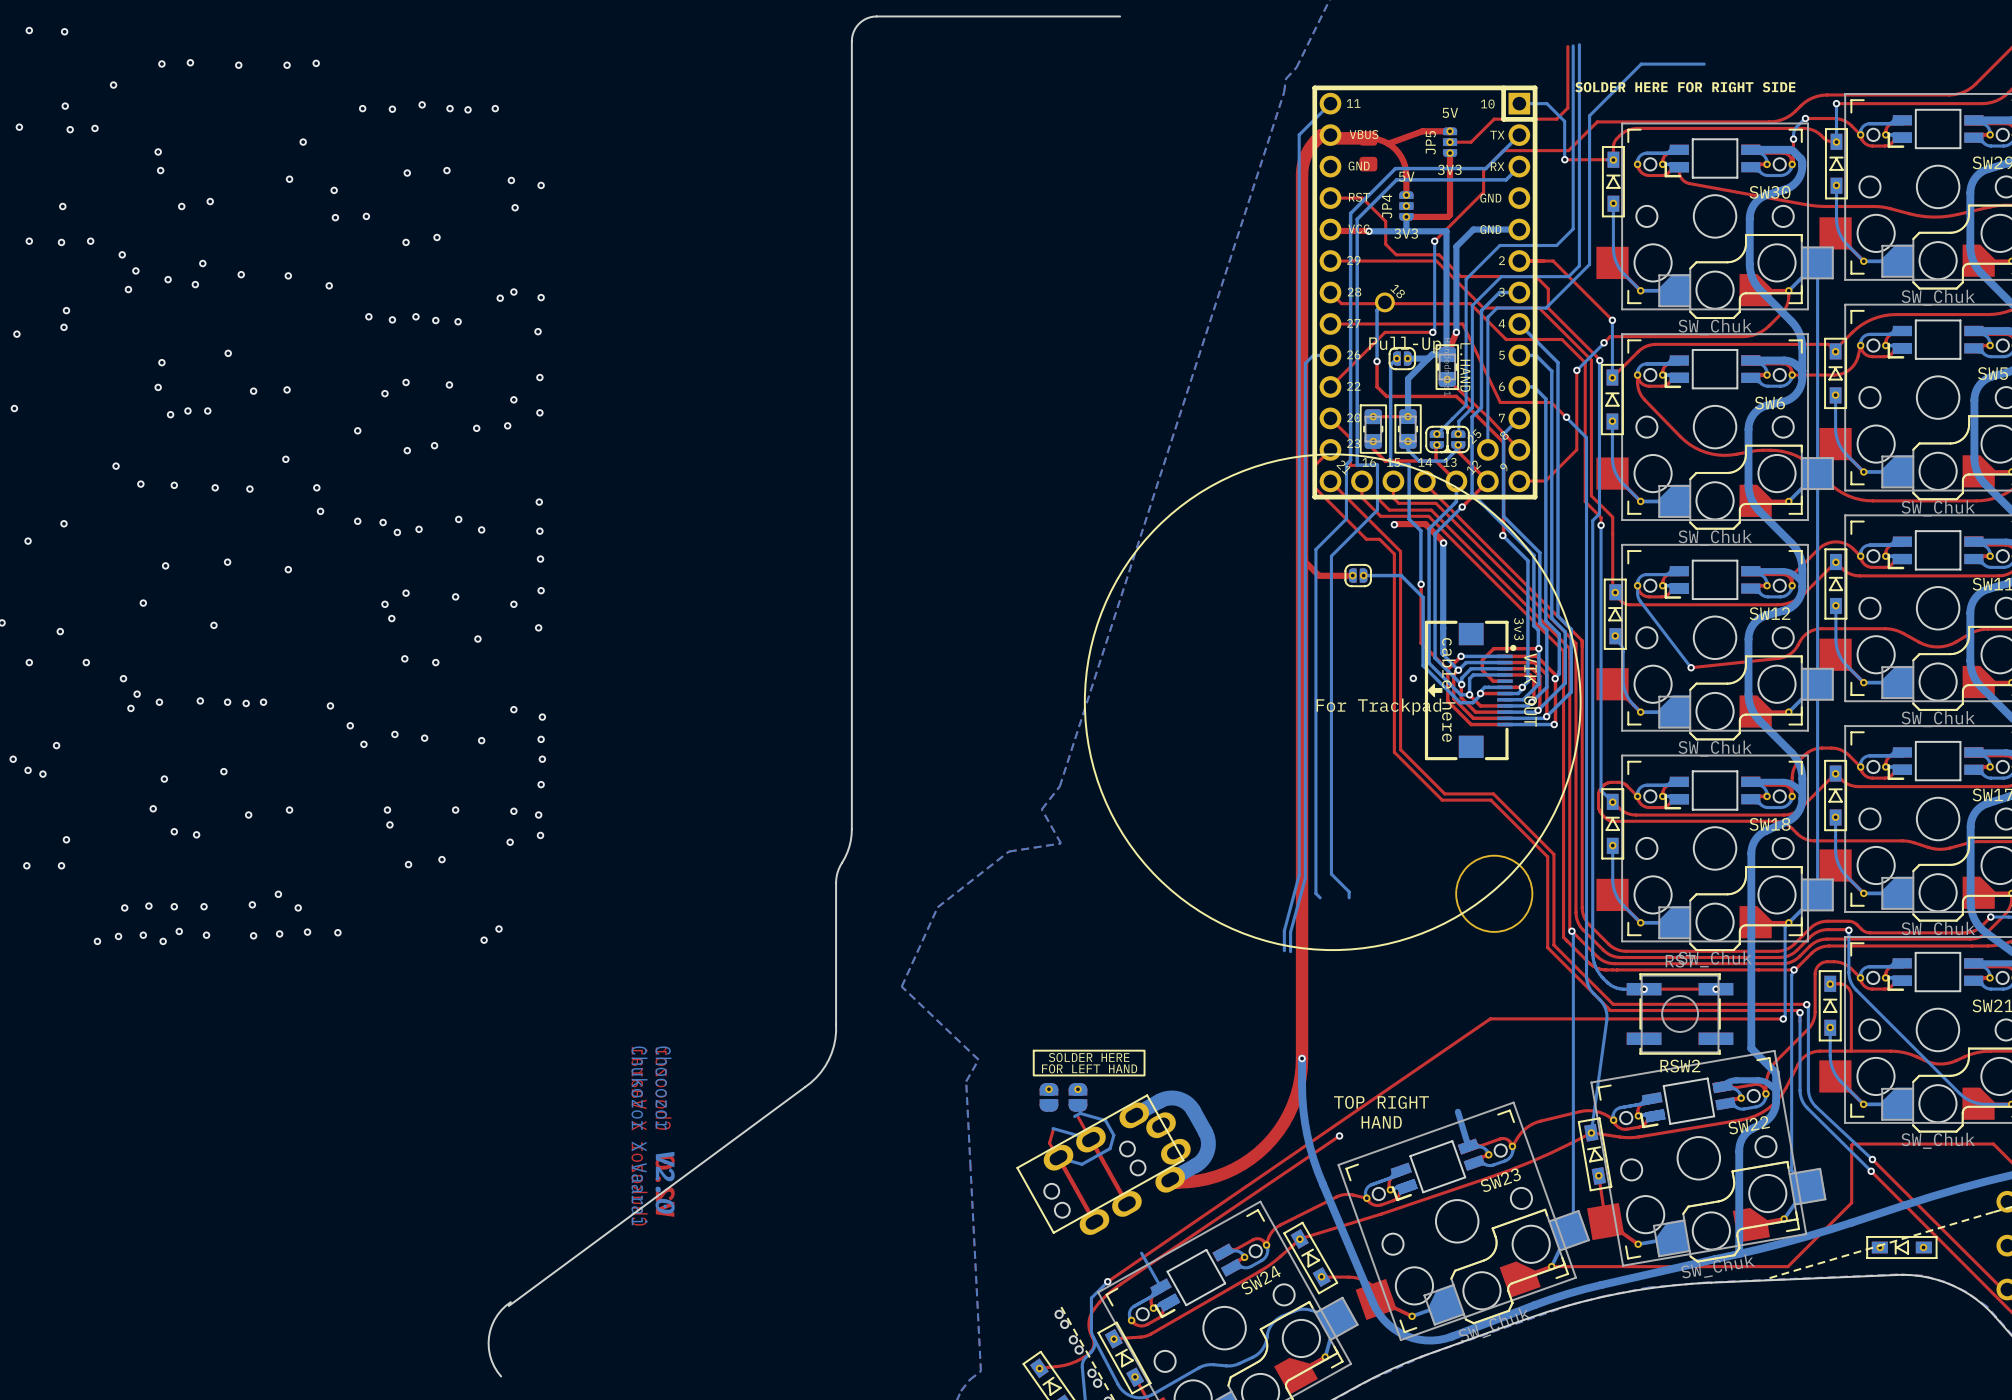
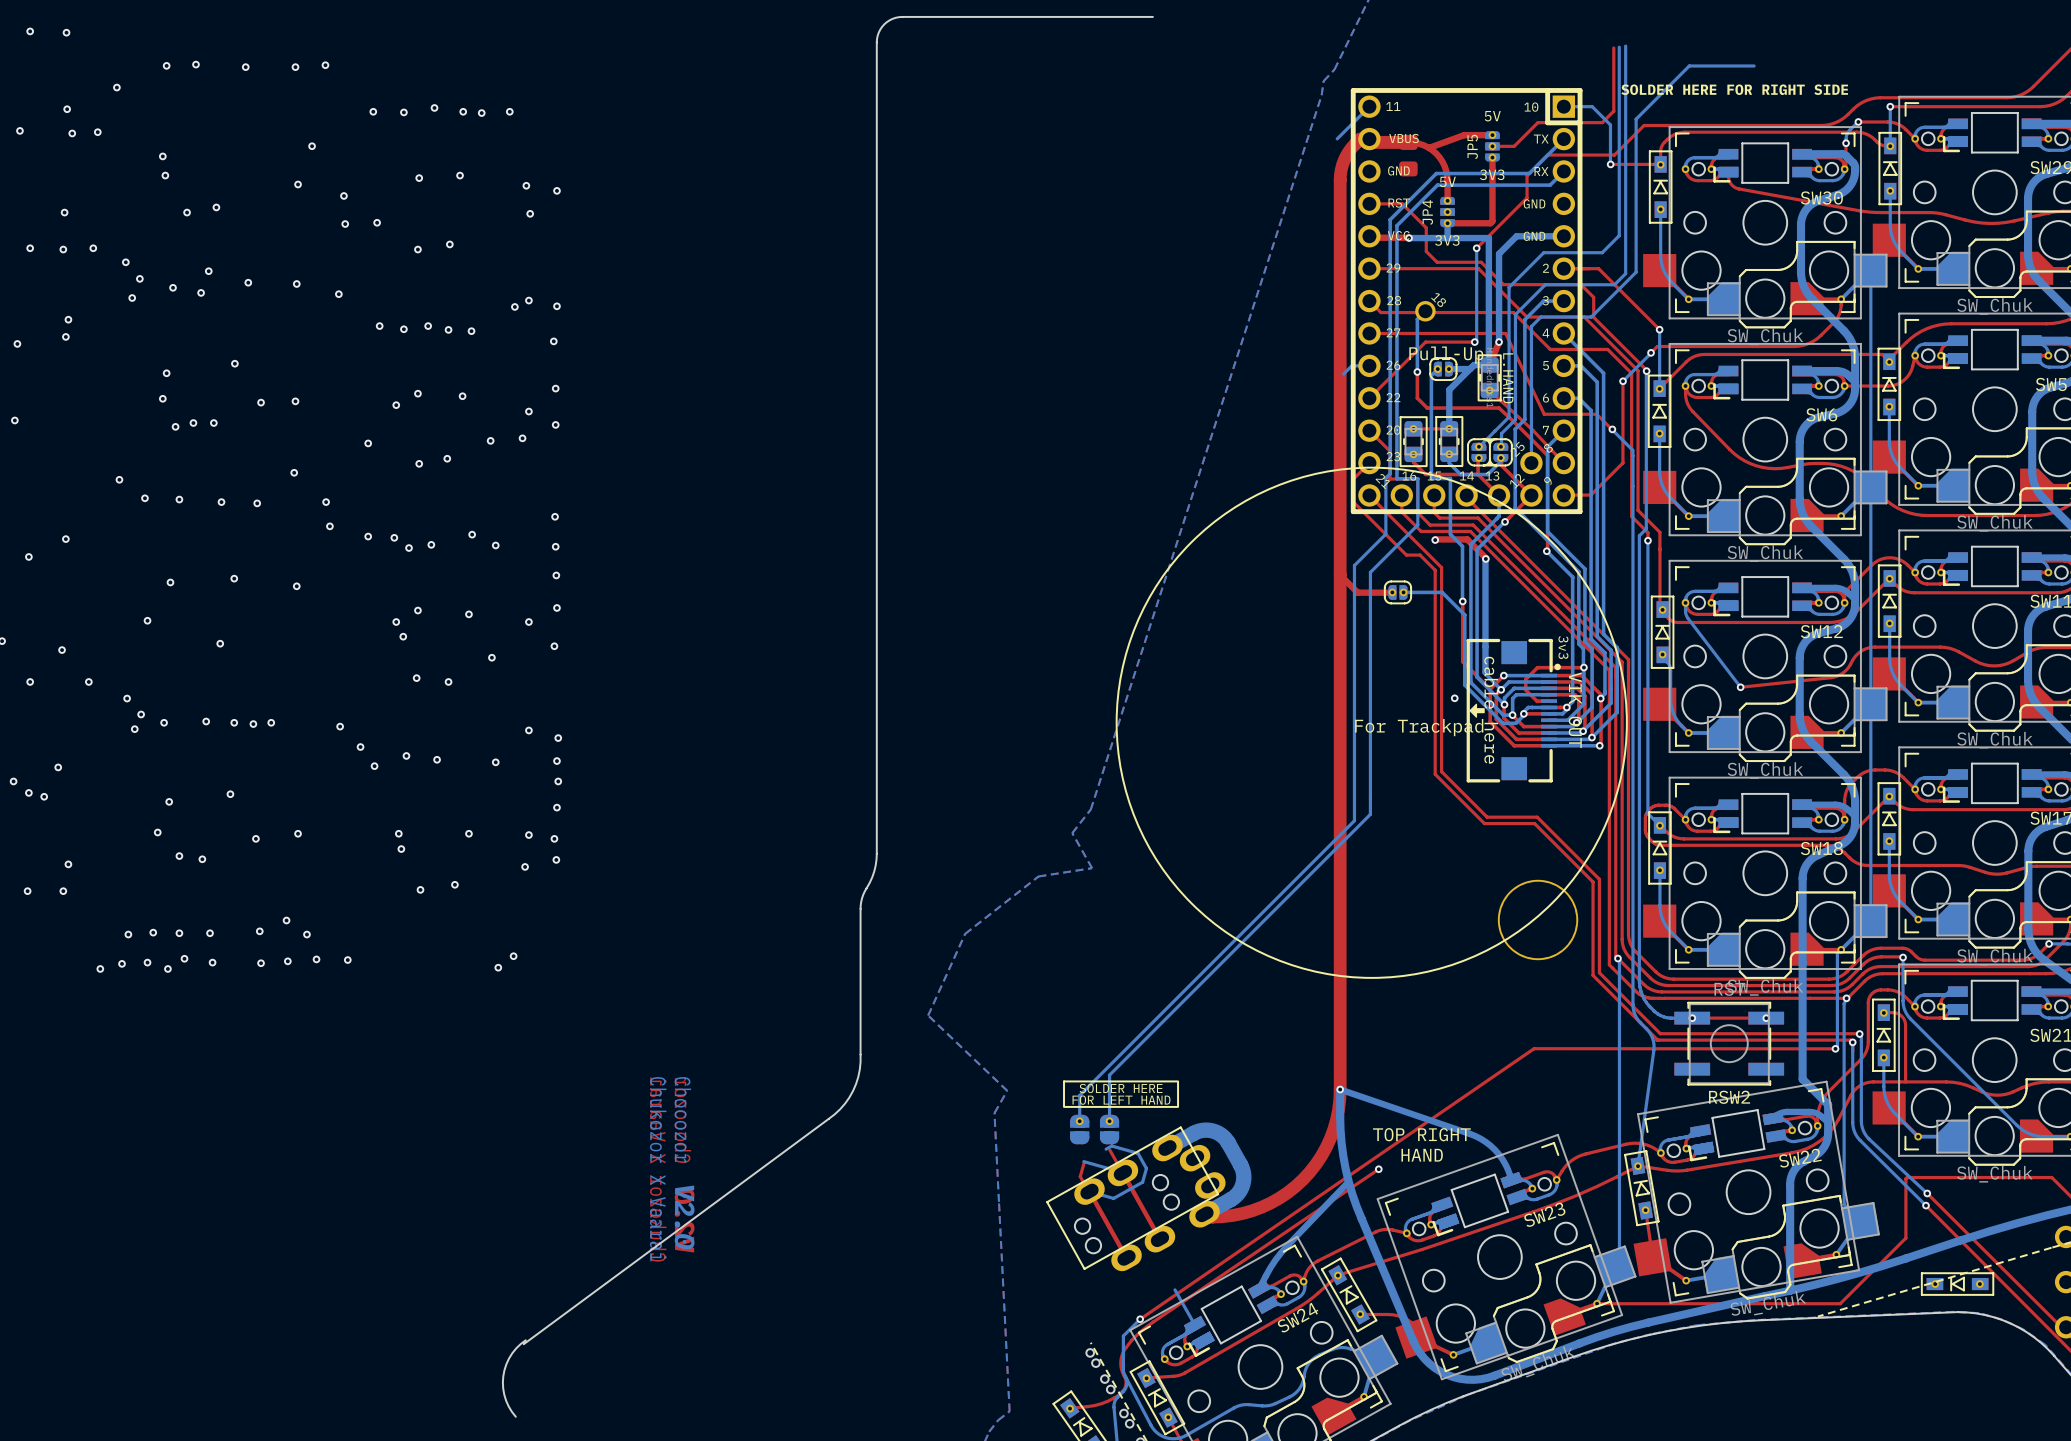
bottom track: (1299, 134) (1299, 875) (1284, 930) (1284, 950) -> none
bottom track: (1305, 363) (1305, 877) (1290, 932) (1290, 951) -> none
bottom track: (1331, 791) (1331, 874) (1349, 891) (1349, 897) -> (1370, 814) (1109, 1075) (1109, 1121)
bottom track: (1315, 797) (1315, 893) (1320, 897) -> (1354, 820) (1079, 1095) (1079, 1121)
bottom track: (1457, 1111) (1467, 1142) -> (1340, 1089) (1475, 1136) (1485, 1142) (1498, 1154) (1510, 1175)
bottom track: none -> (1348, 1181) (1281, 1252) (1259, 1289)

